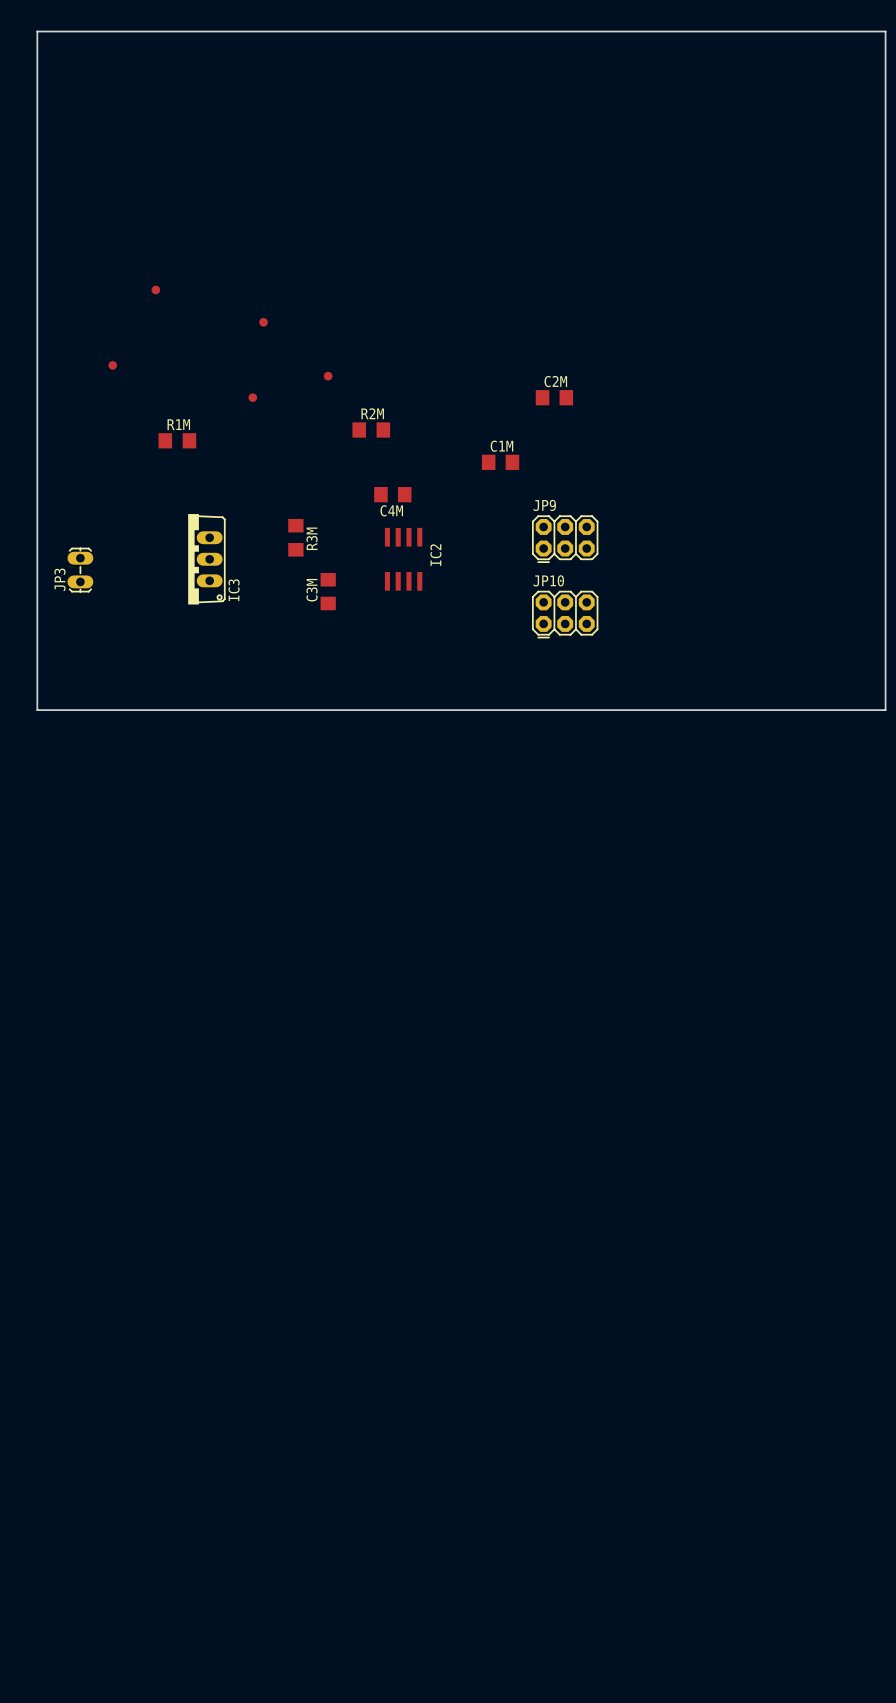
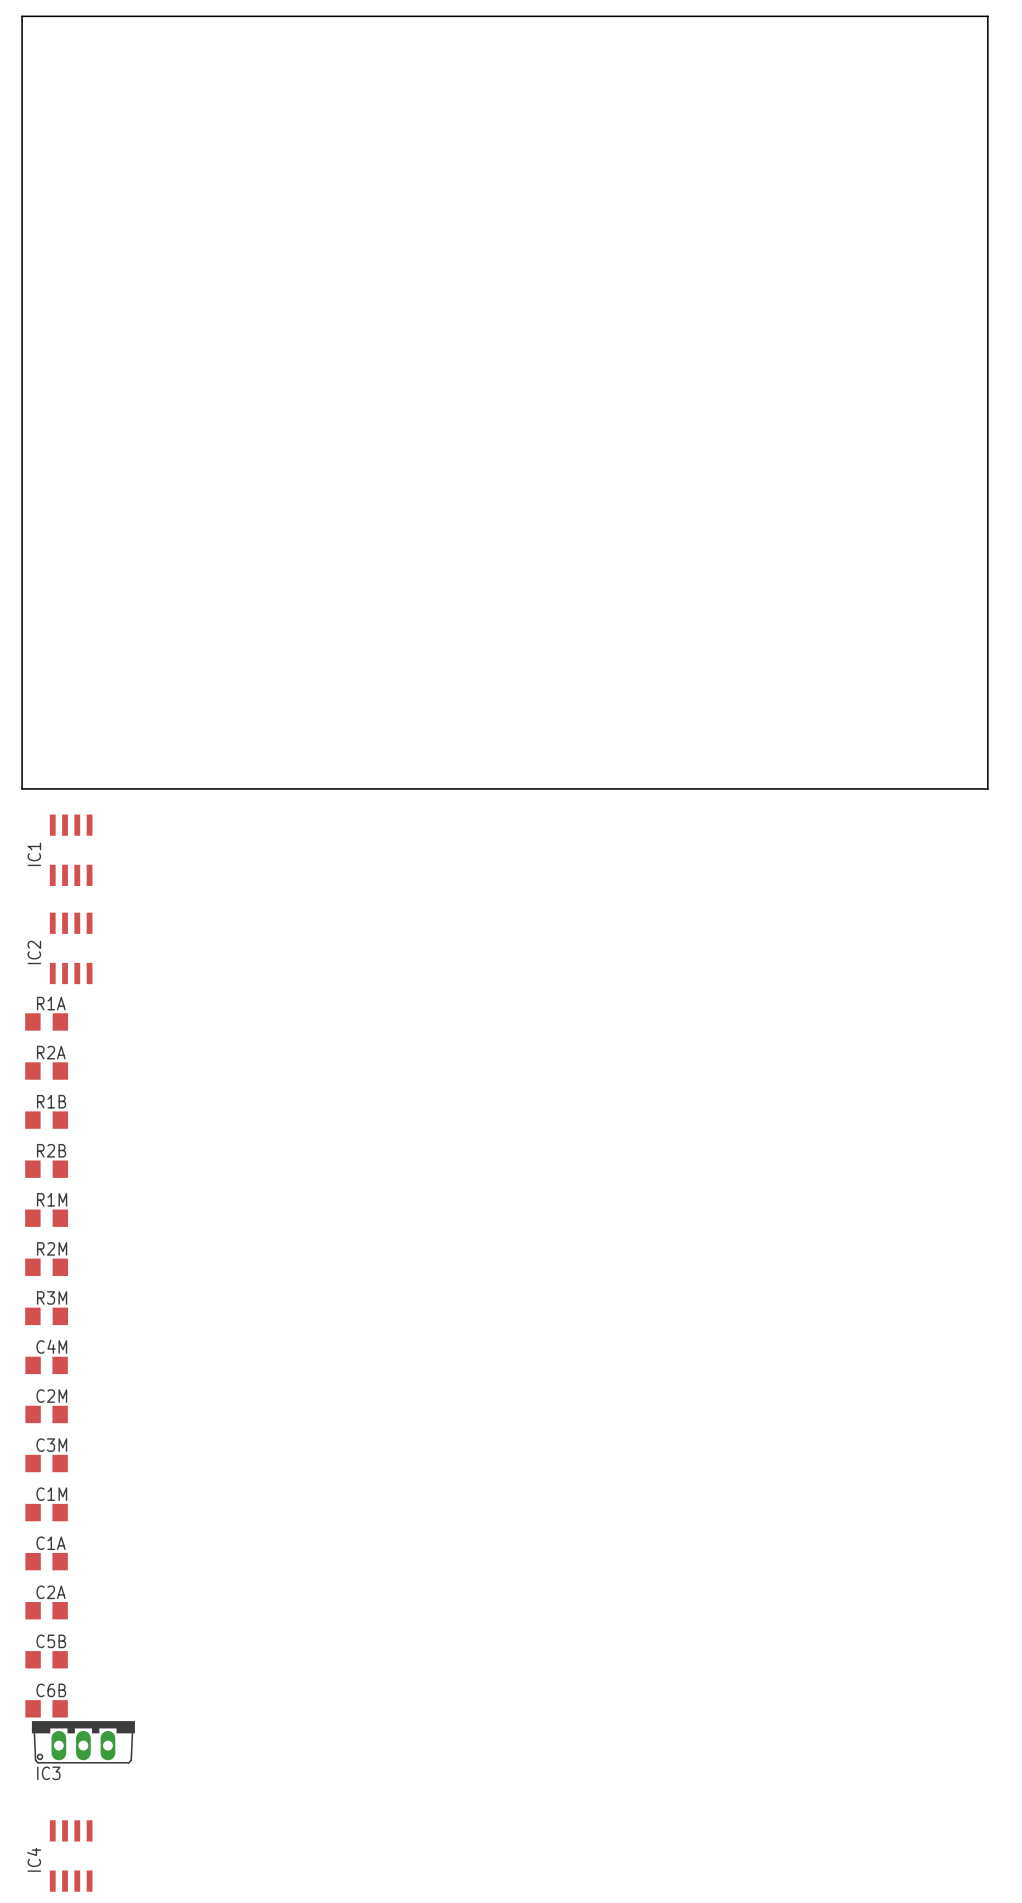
part: (155, 289) -> none
part: (263, 322) -> none
part: (112, 365) -> none
part: (328, 376) -> none
part: (252, 397) -> none
C2M position: (554, 397) -> (46, 1414)
R2M position: (371, 430) -> (46, 1267)
R1M position: (177, 440) -> (46, 1218)
C1M position: (500, 462) -> (46, 1512)
C4M position: (392, 494) -> (46, 1365)
C4M name position: C4M (391, 510) -> C4M (51, 1346)
R3M rotation: 0° (295, 537) -> 90° clockwise (46, 1316)
R3M position: (295, 537) -> (46, 1316)
R3M name position: R3M (312, 538) -> R3M (52, 1297)
JP9: (565, 539) -> none
IC2 name position: IC2 (435, 555) -> IC2 (34, 952)
IC3 rotation: 0° (206, 559) -> 90° clockwise (83, 1742)
IC3 position: (206, 559) -> (83, 1742)
IC2 position: (403, 559) -> (71, 948)
JP3: (80, 570) -> none
C3M rotation: 0° (328, 591) -> 90° clockwise (46, 1463)
C3M position: (328, 591) -> (46, 1463)
JP10: (565, 614) -> none
IC1: none -> (71, 850)
R1A: none -> (46, 1021)
R2A: none -> (46, 1071)
R1B: none -> (46, 1120)
R2B: none -> (46, 1169)
C1A: none -> (46, 1561)
C2A: none -> (46, 1610)
C5B: none -> (46, 1659)
C6B: none -> (46, 1708)
IC4: none -> (71, 1856)

